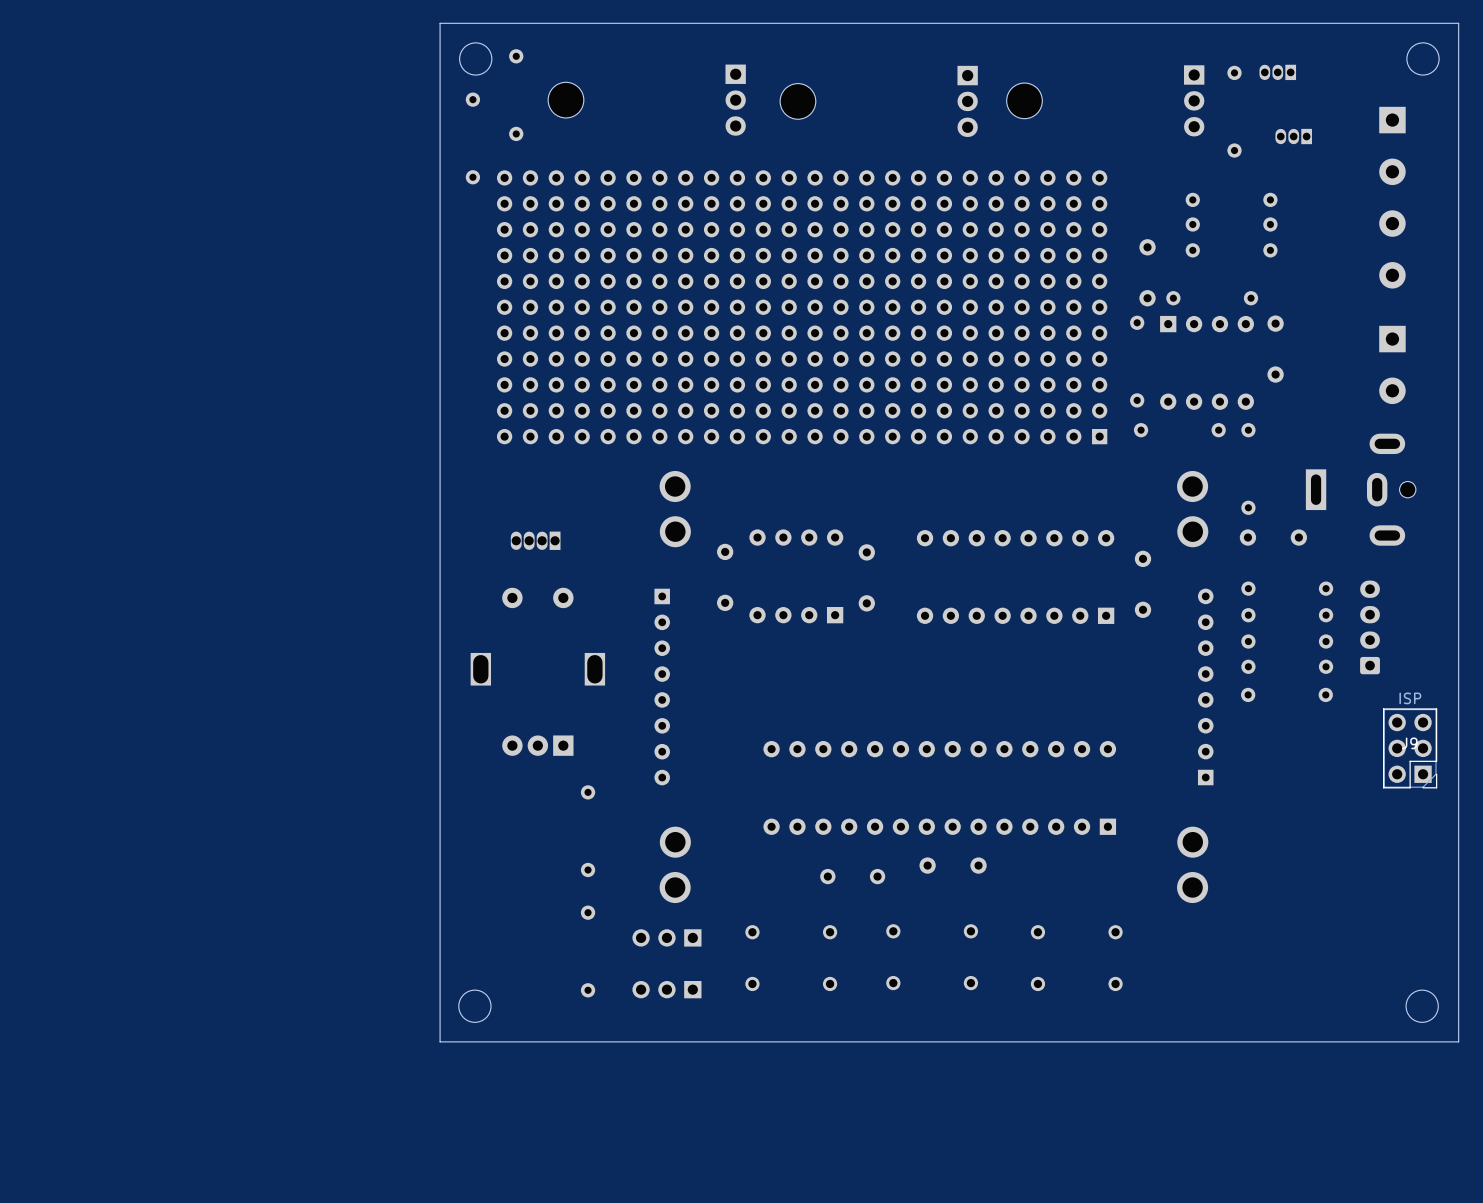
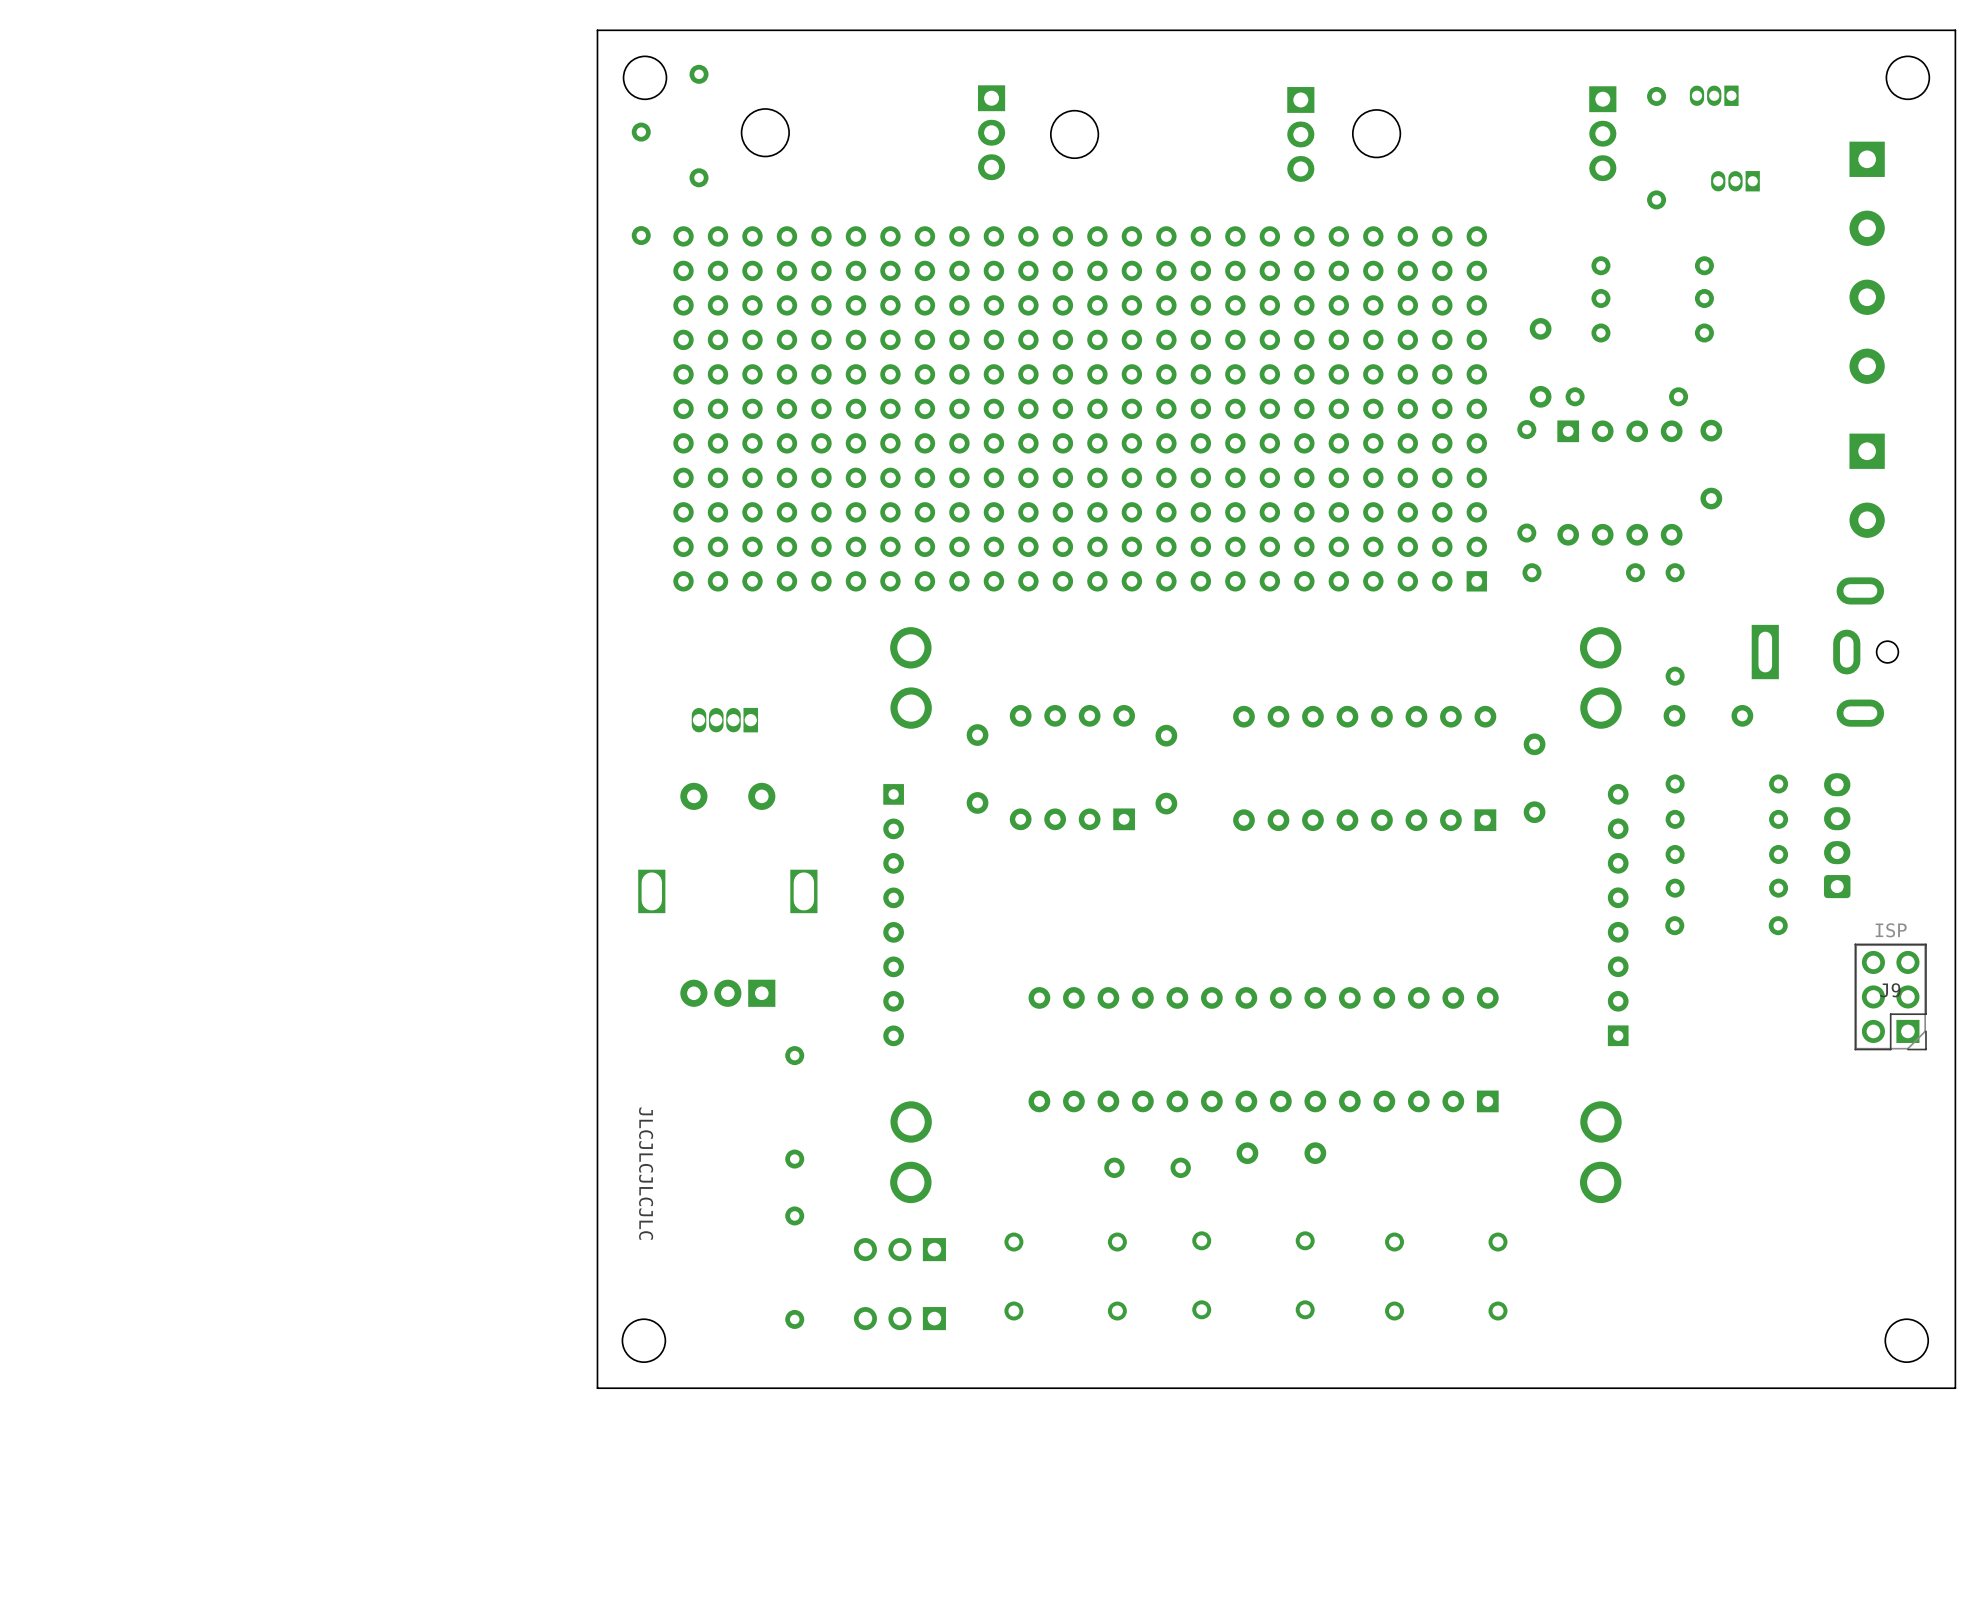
text: none -> JLCJLCJLCJLC (646, 1173)

